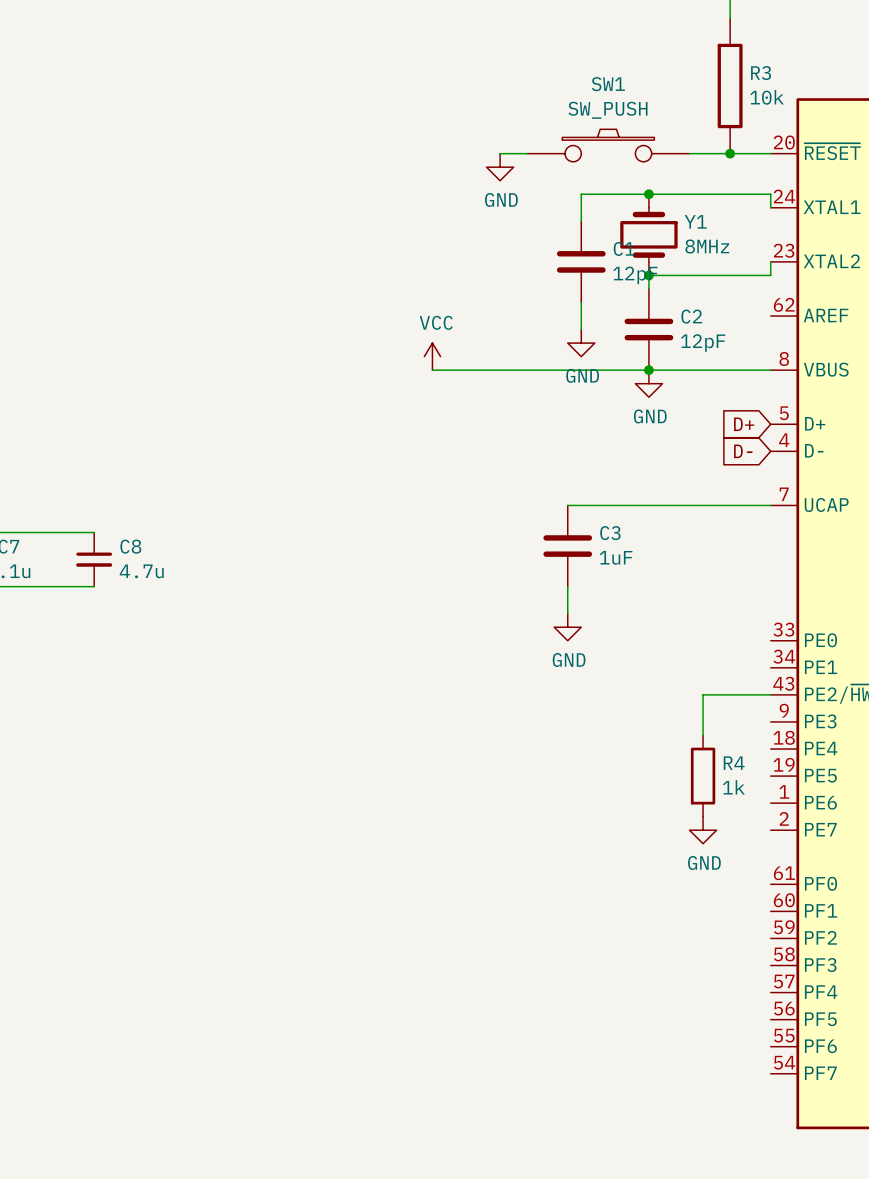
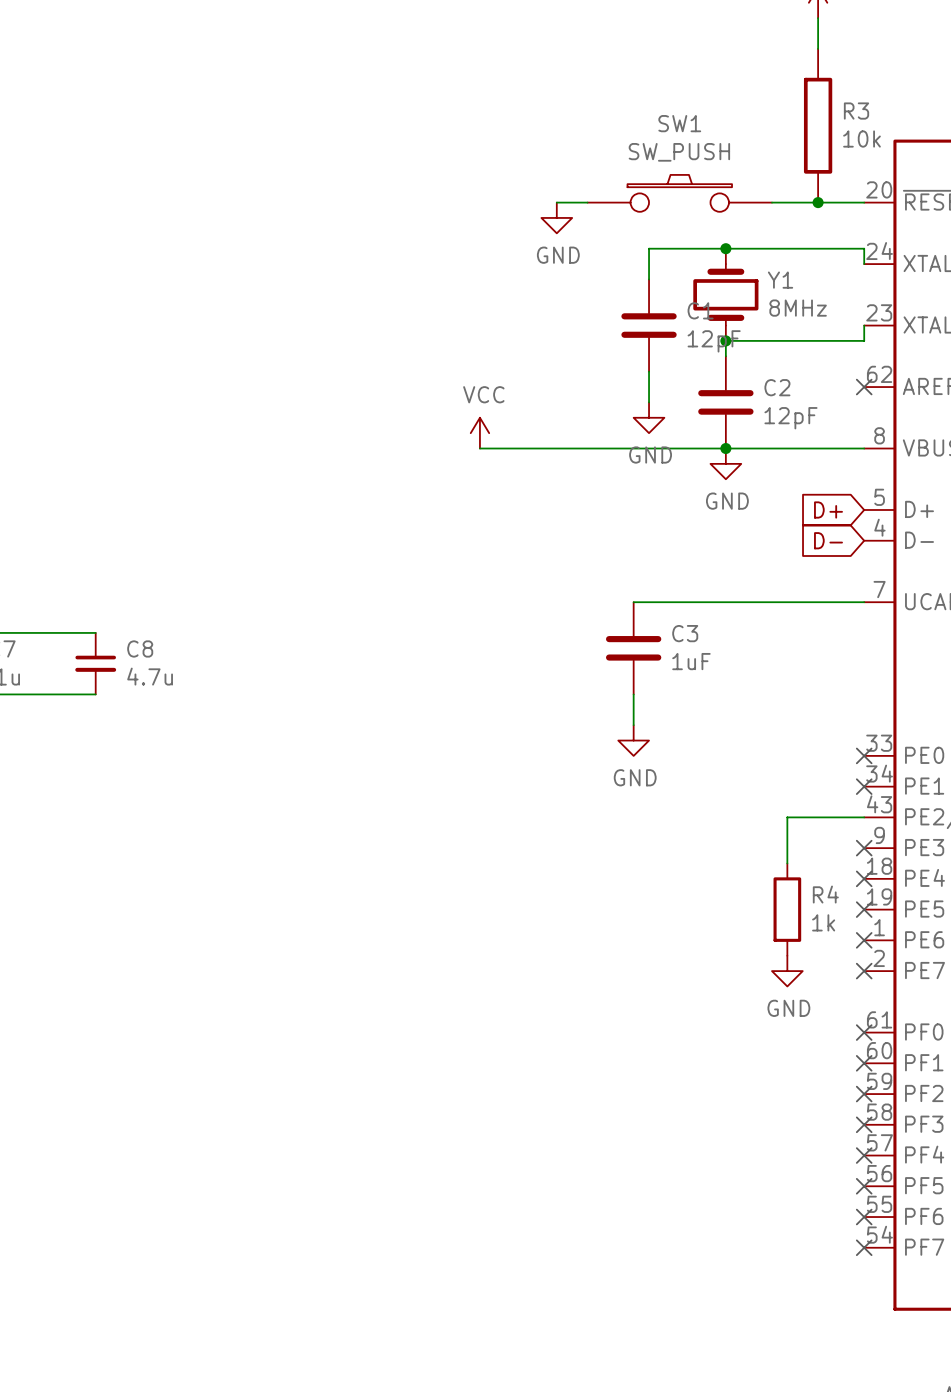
no-connect mark: none -> (864, 387)
no-connect mark: none -> (864, 755)
no-connect mark: none -> (864, 786)
no-connect mark: none -> (864, 848)
no-connect mark: none -> (864, 878)
no-connect mark: none -> (864, 909)
no-connect mark: none -> (864, 940)
no-connect mark: none -> (864, 971)
no-connect mark: none -> (864, 1032)
no-connect mark: none -> (864, 1063)
no-connect mark: none -> (864, 1094)
no-connect mark: none -> (864, 1124)
no-connect mark: none -> (864, 1155)
no-connect mark: none -> (864, 1186)
no-connect mark: none -> (864, 1217)
no-connect mark: none -> (864, 1247)

